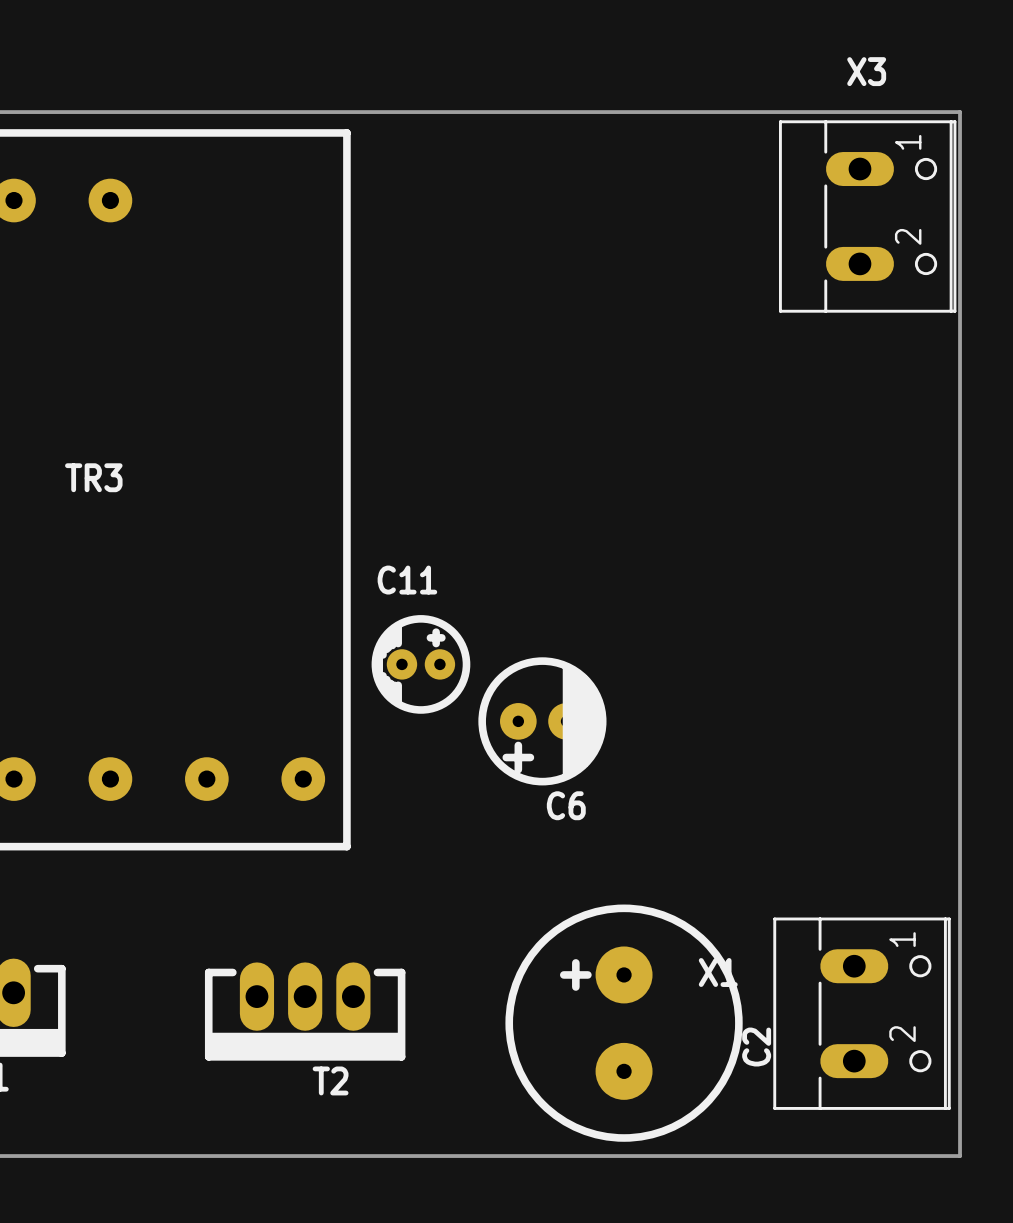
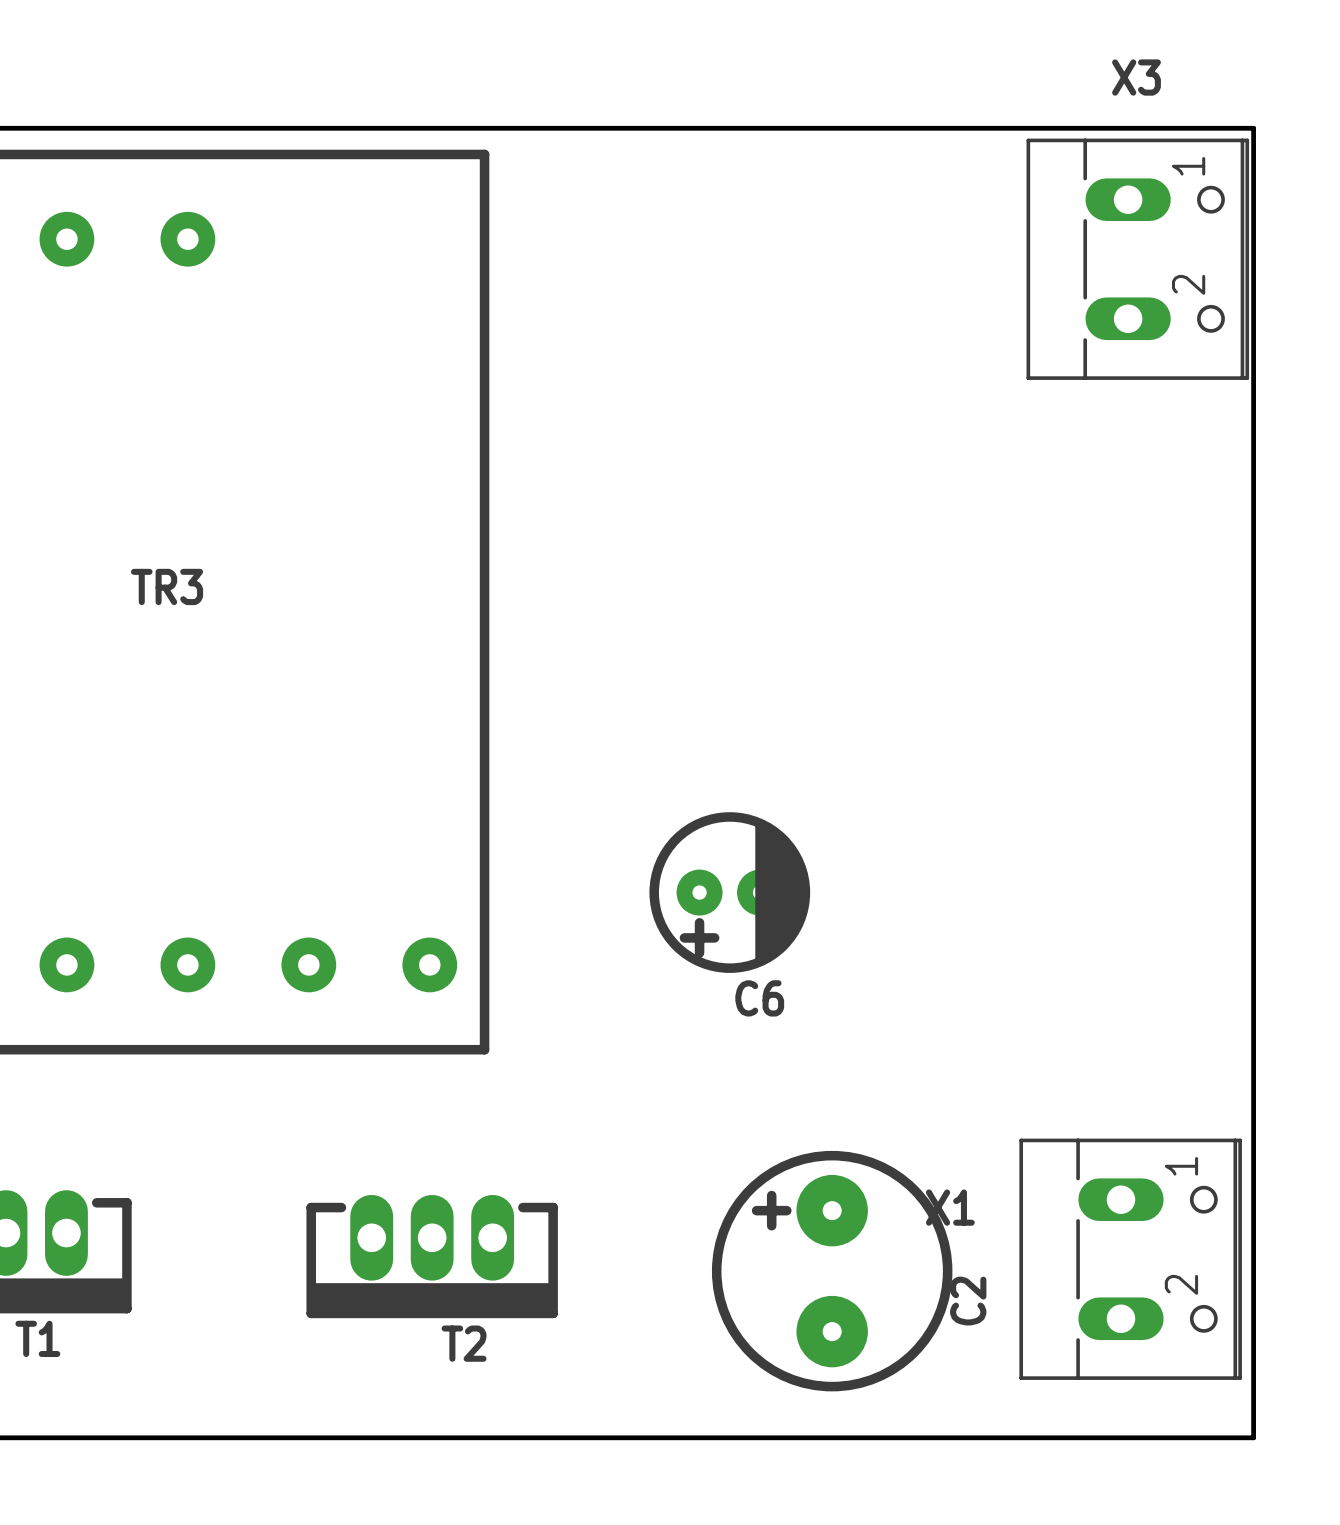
C11: (420, 664) -> none
C2 footprint: [505, 904, 743, 1142] -> [711, 1150, 953, 1392]

